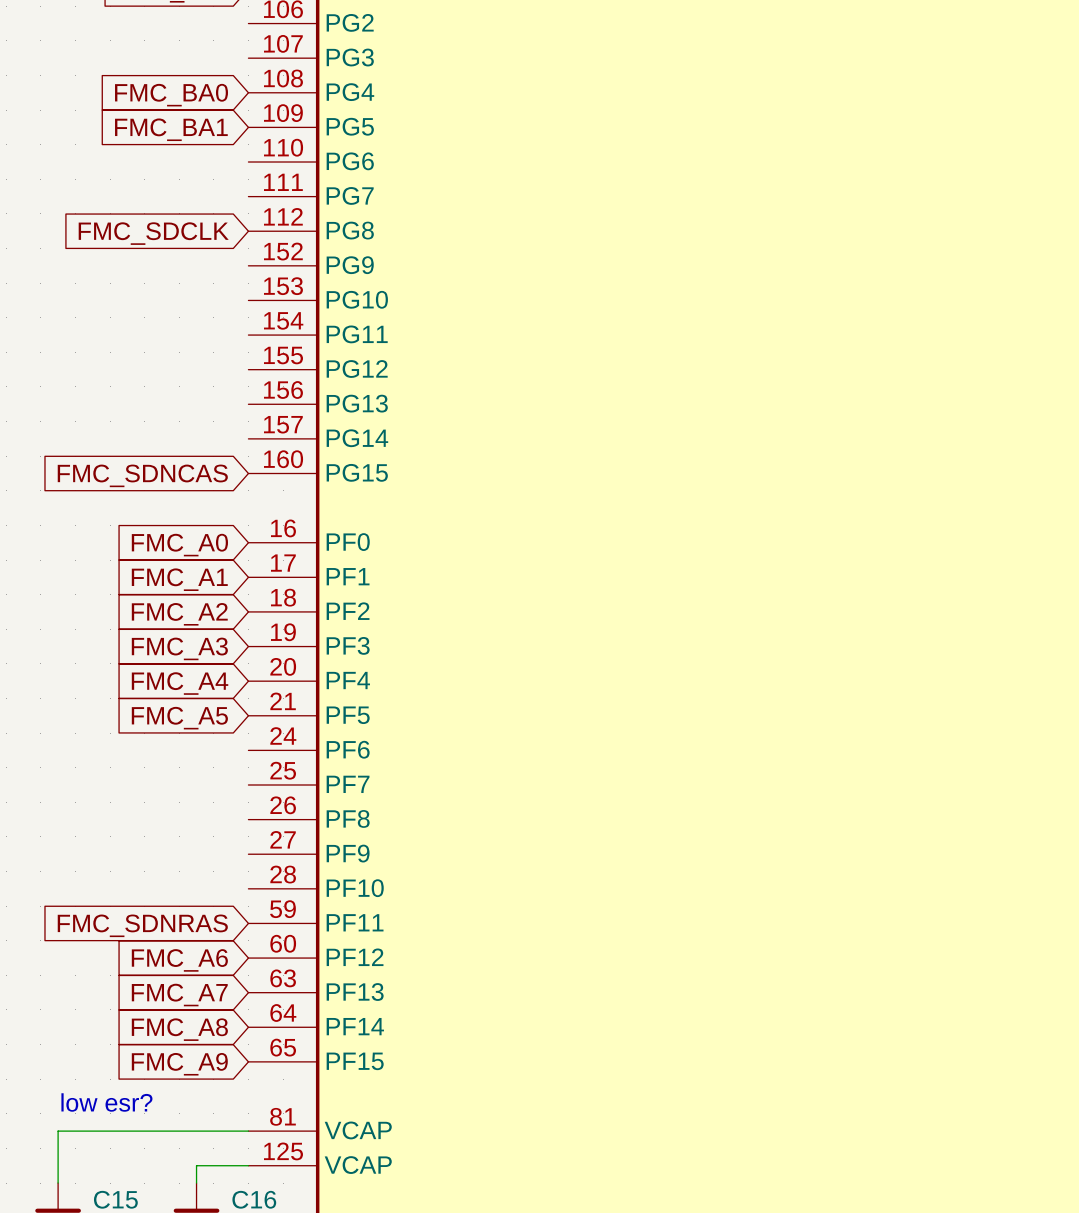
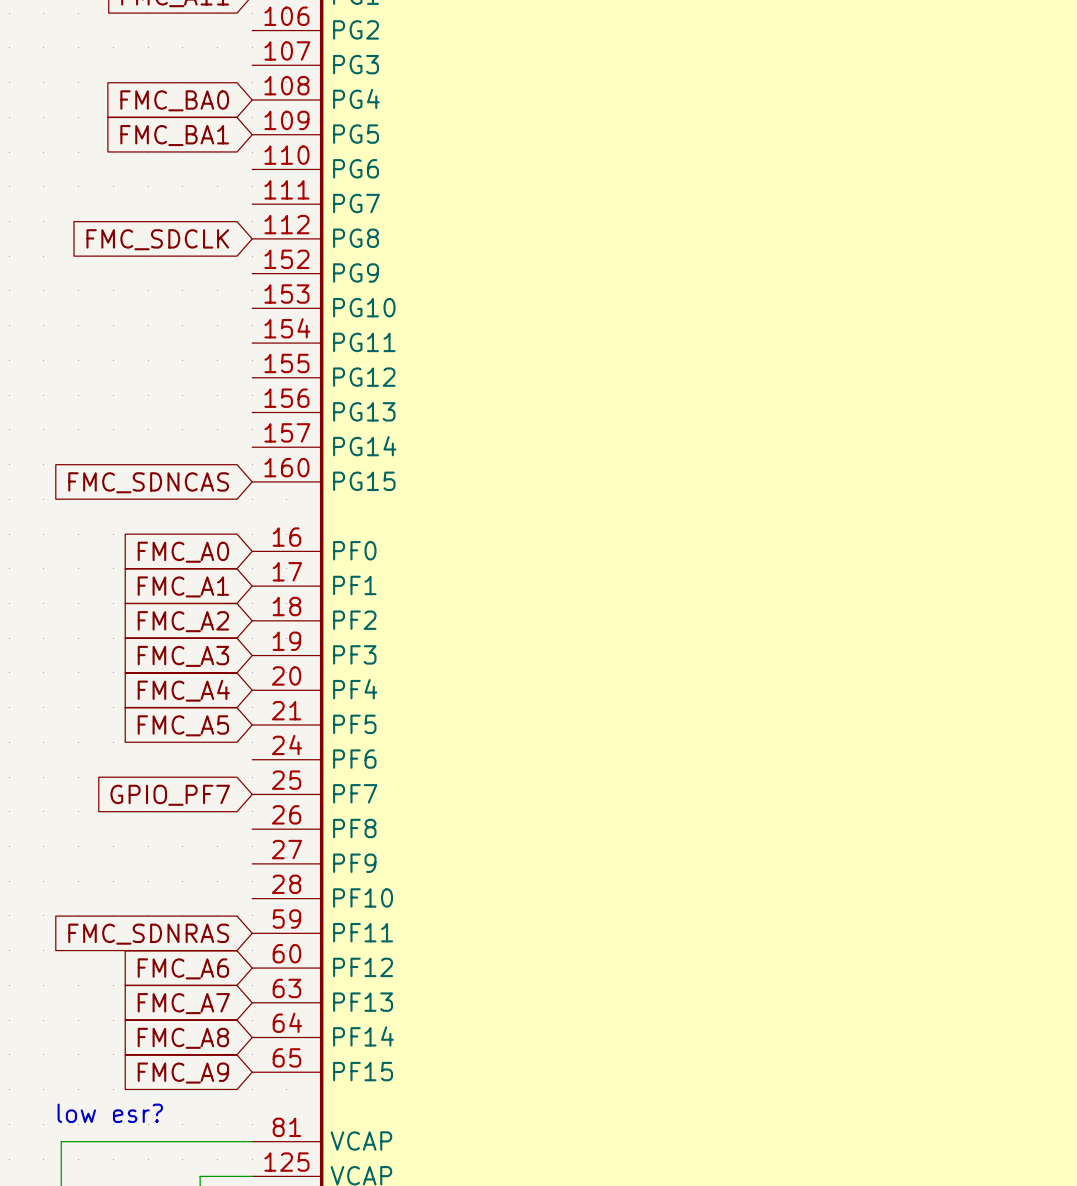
global label: none -> GPIO_PF7 (170, 795)

